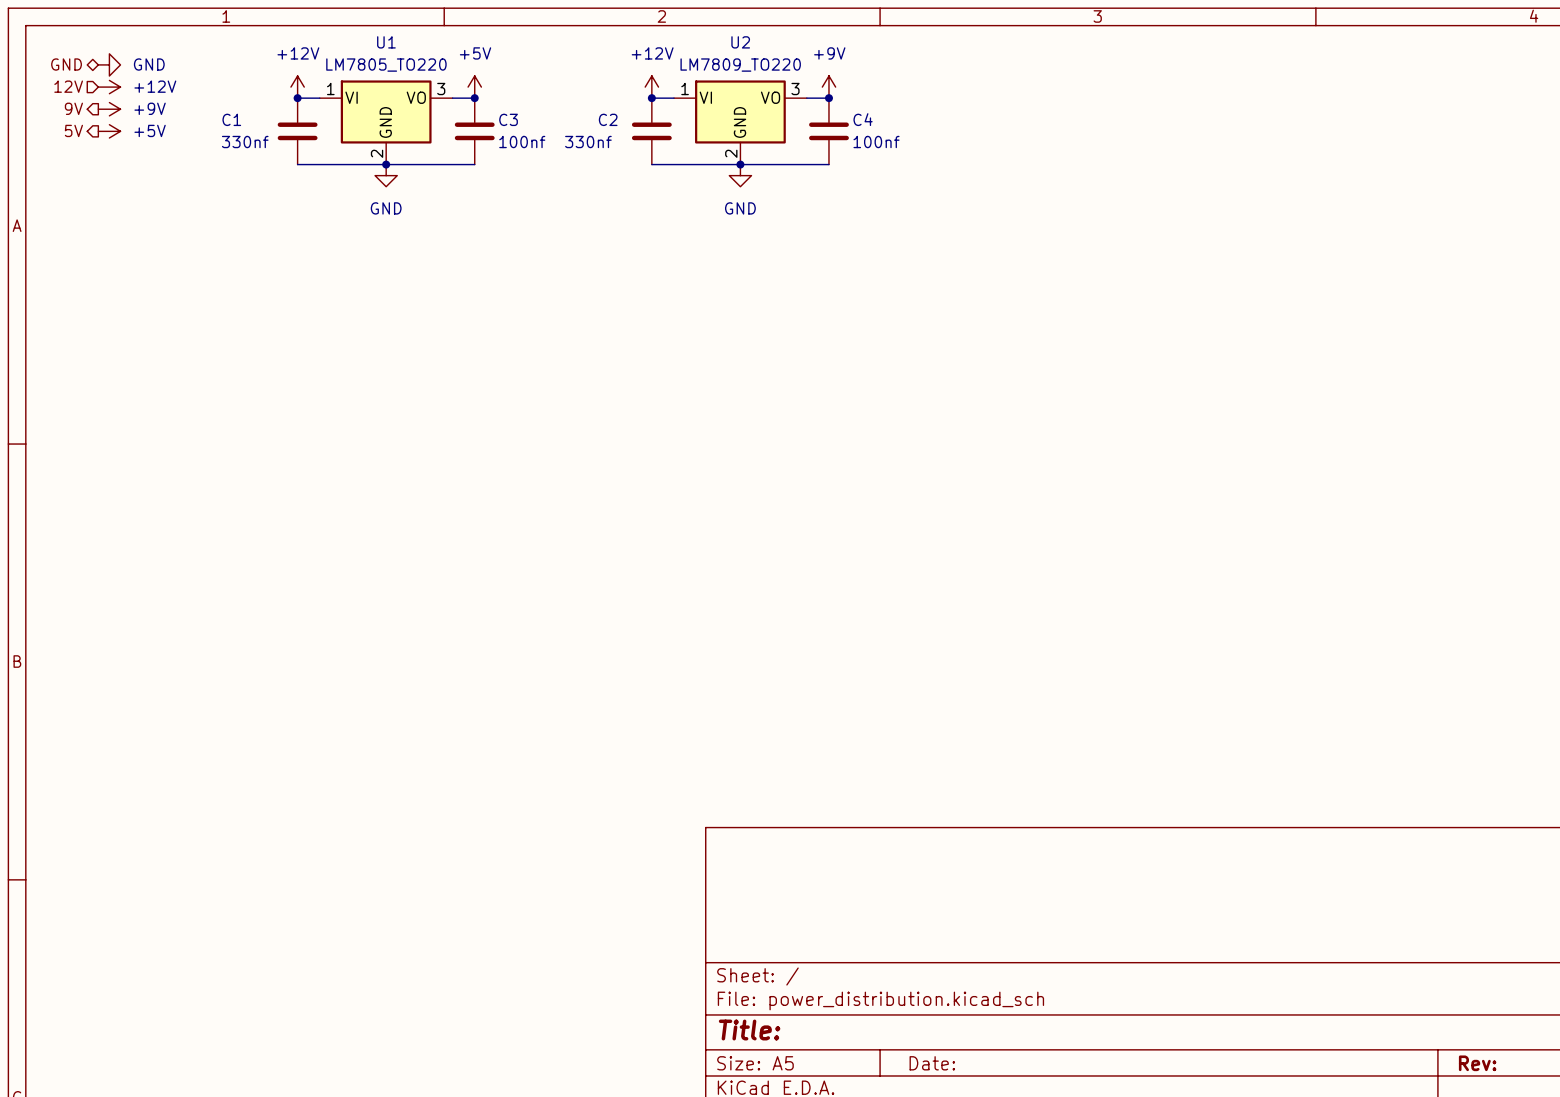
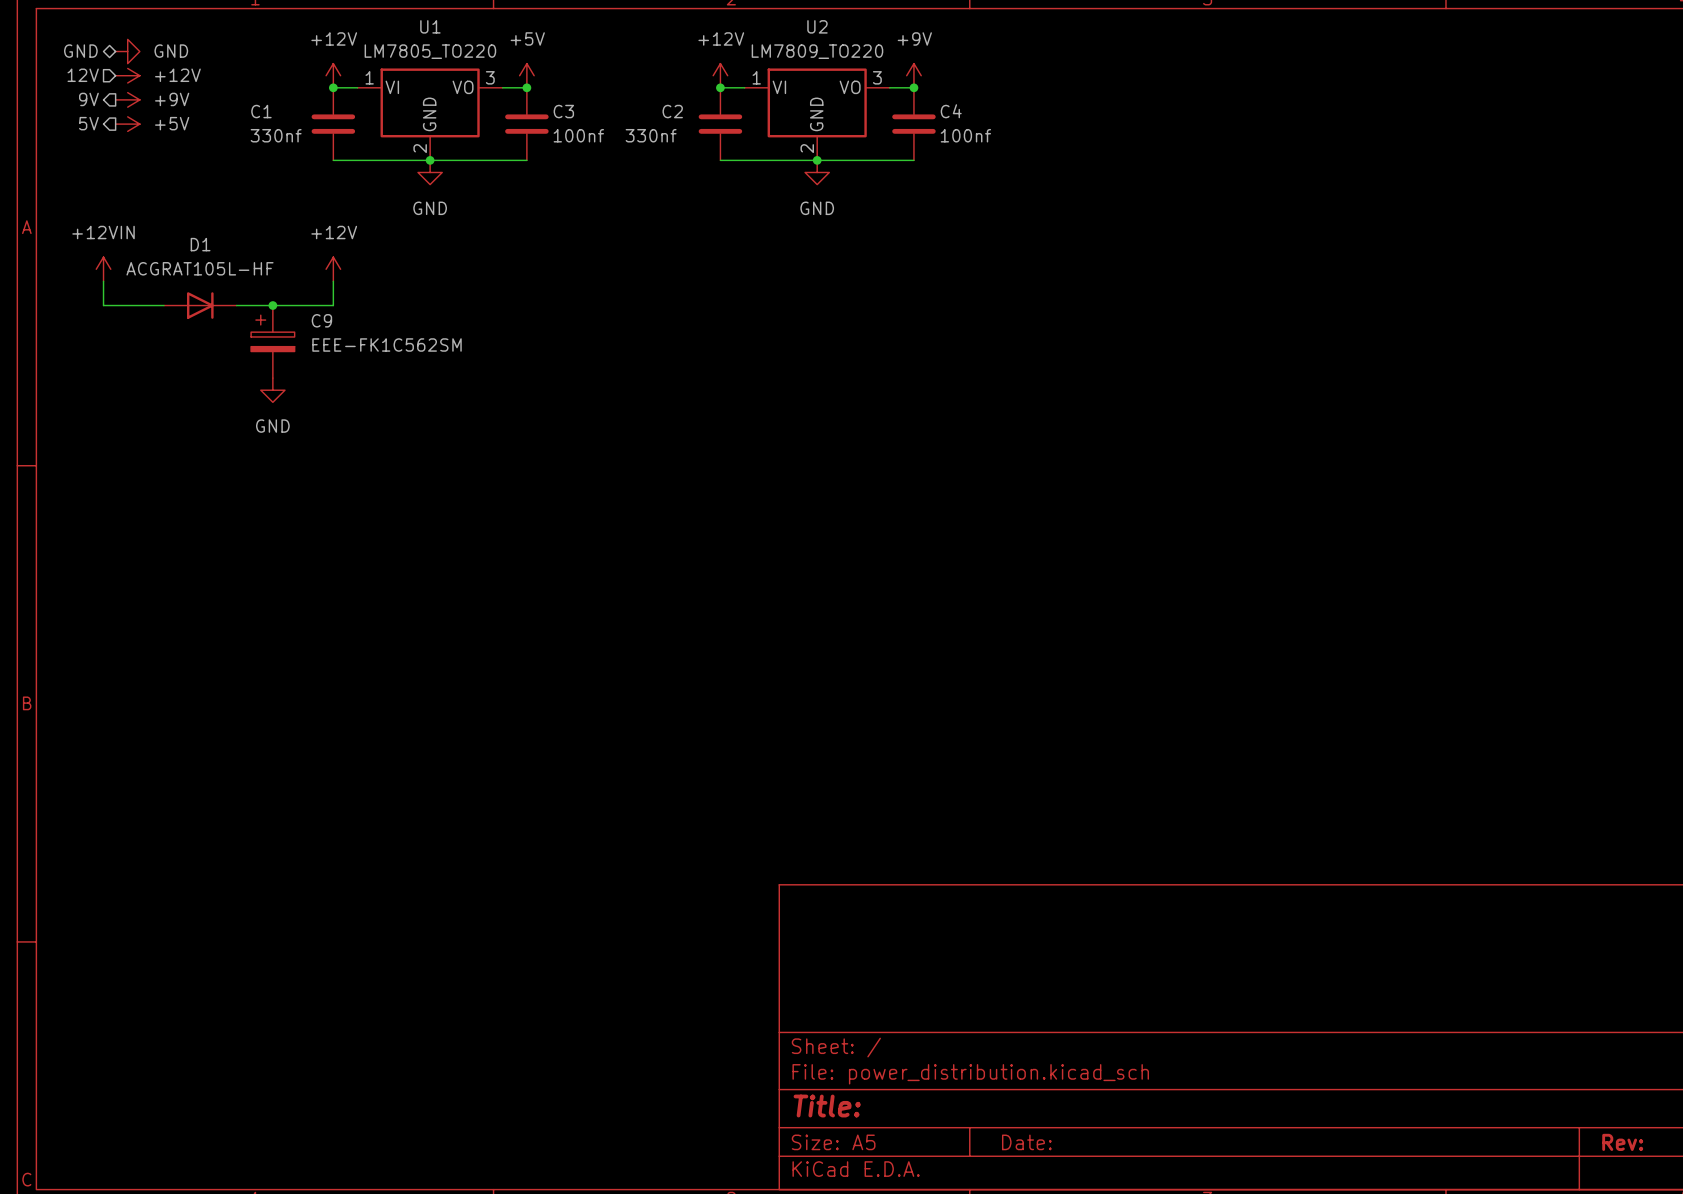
power symbol: none -> +12VIN (103, 269)
power symbol: none -> +12V (333, 269)
wire: none -> (103, 281) (103, 305) (164, 305)
wire: none -> (333, 281) (333, 305) (236, 305)
D1: none -> ACGRAT105L-HF (200, 305)
junction: none -> (272, 305)
C9: none -> EEE-FK1C562SM (272, 341)
power symbol: none -> GND (272, 390)

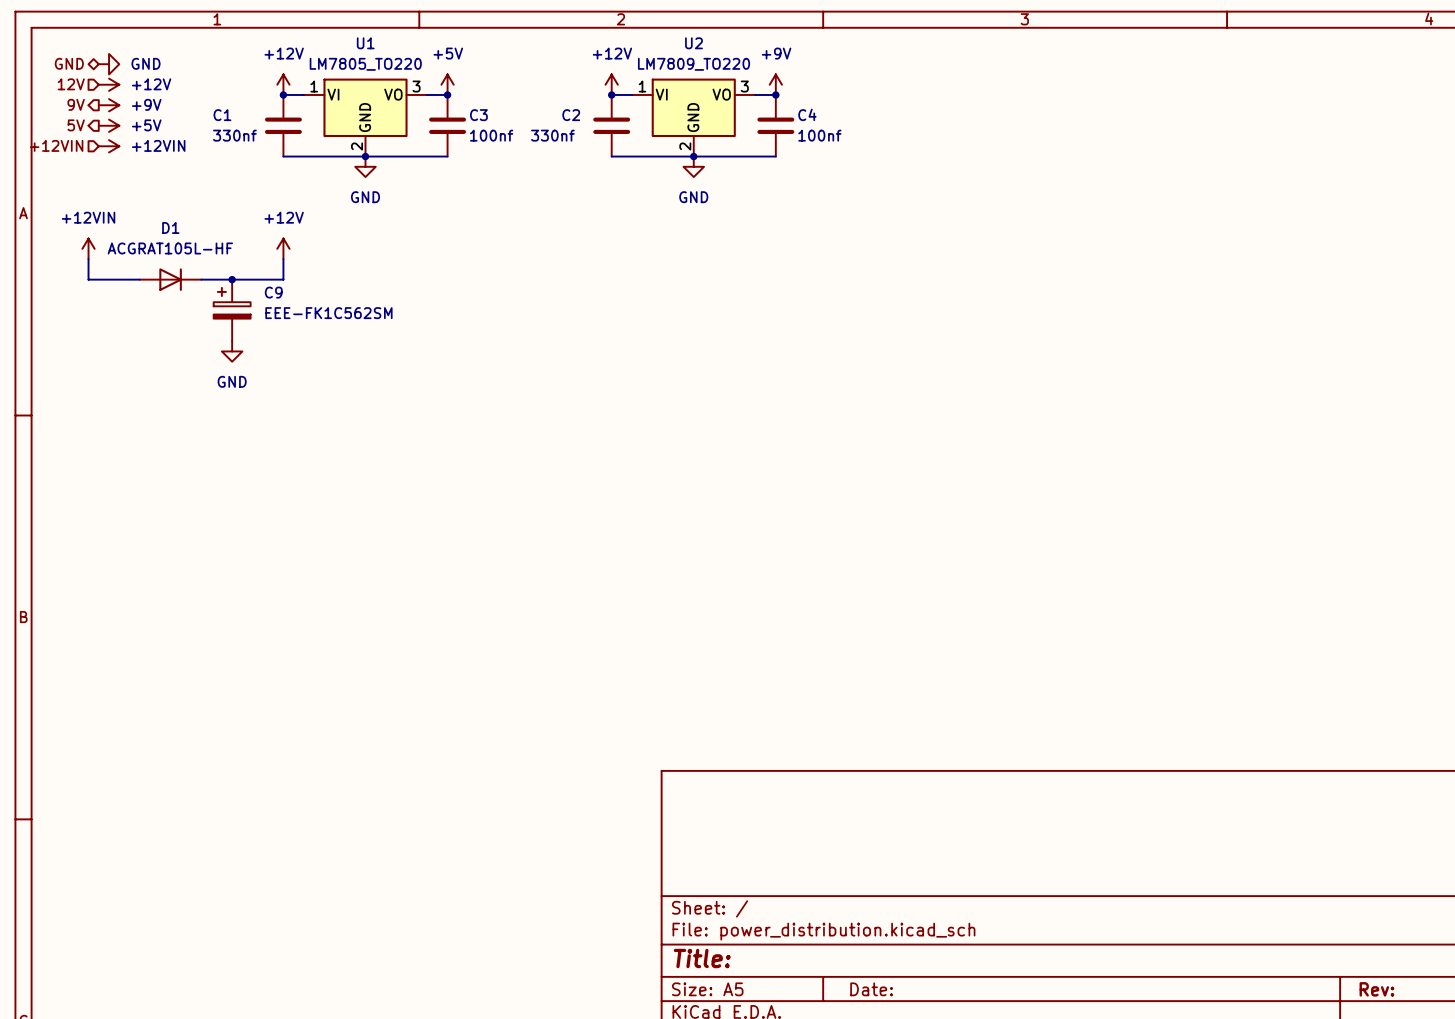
hierarchical label: none -> +12VIN (56, 145)
power symbol: none -> +12VIN (109, 146)

